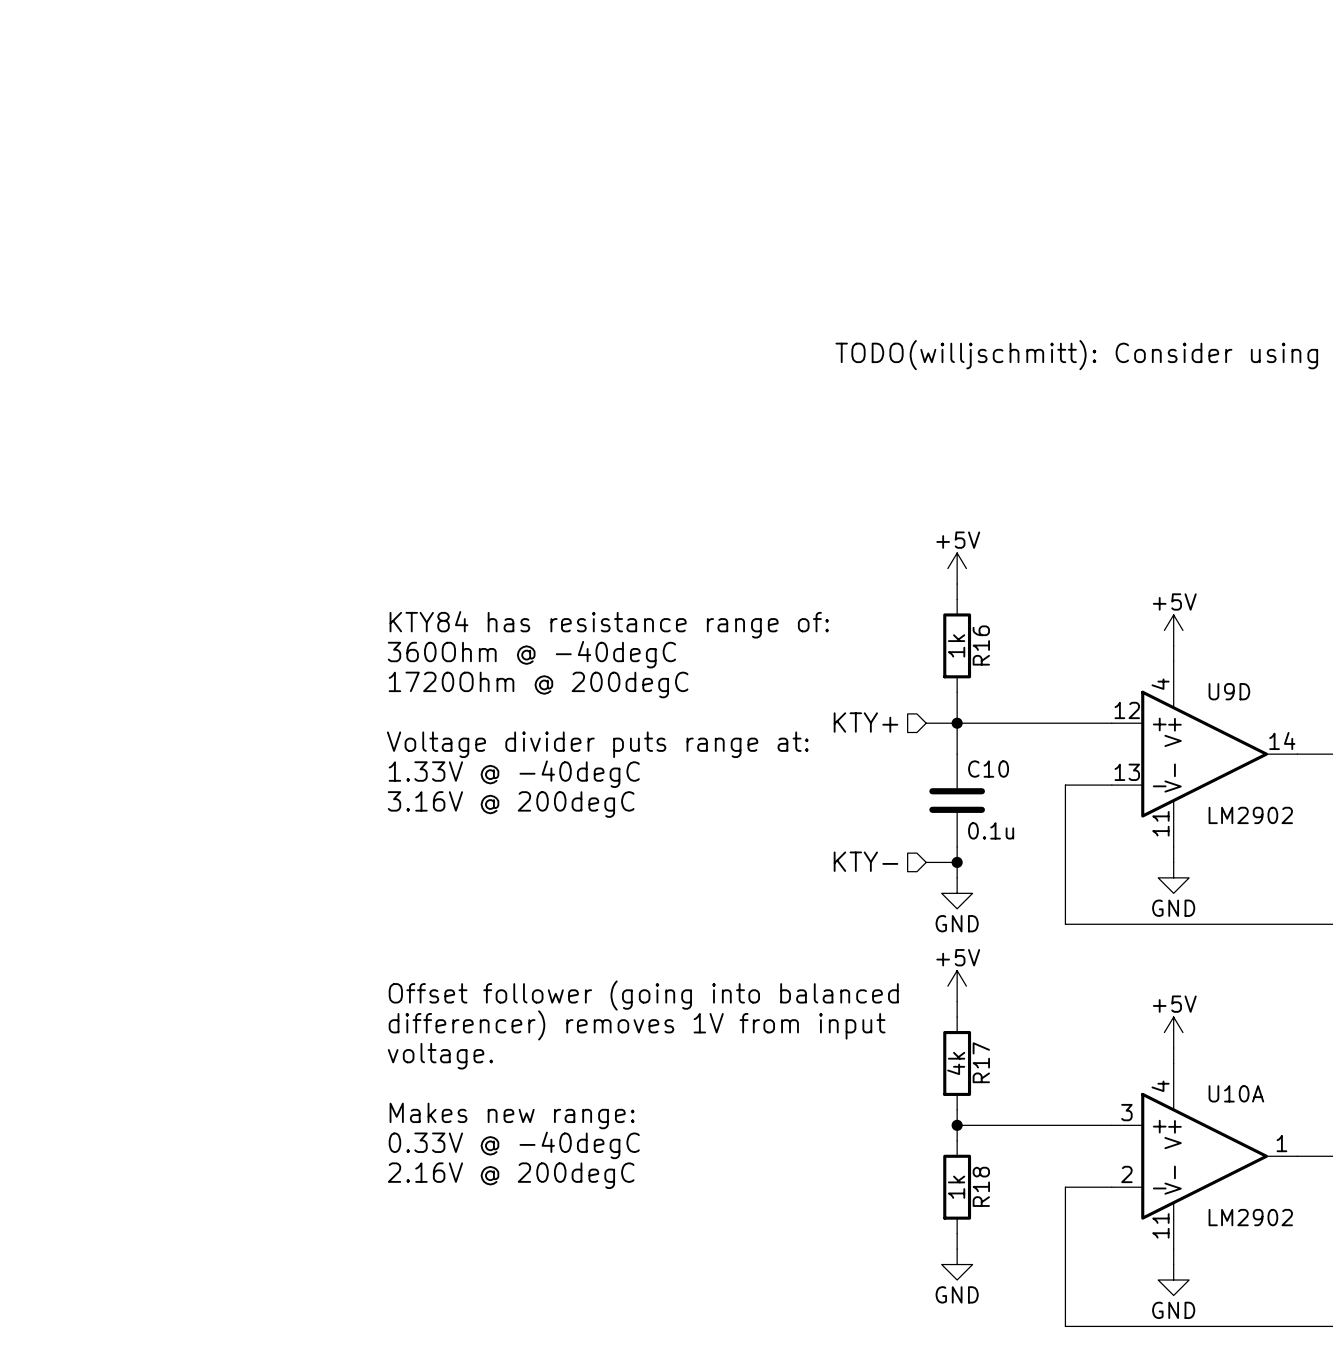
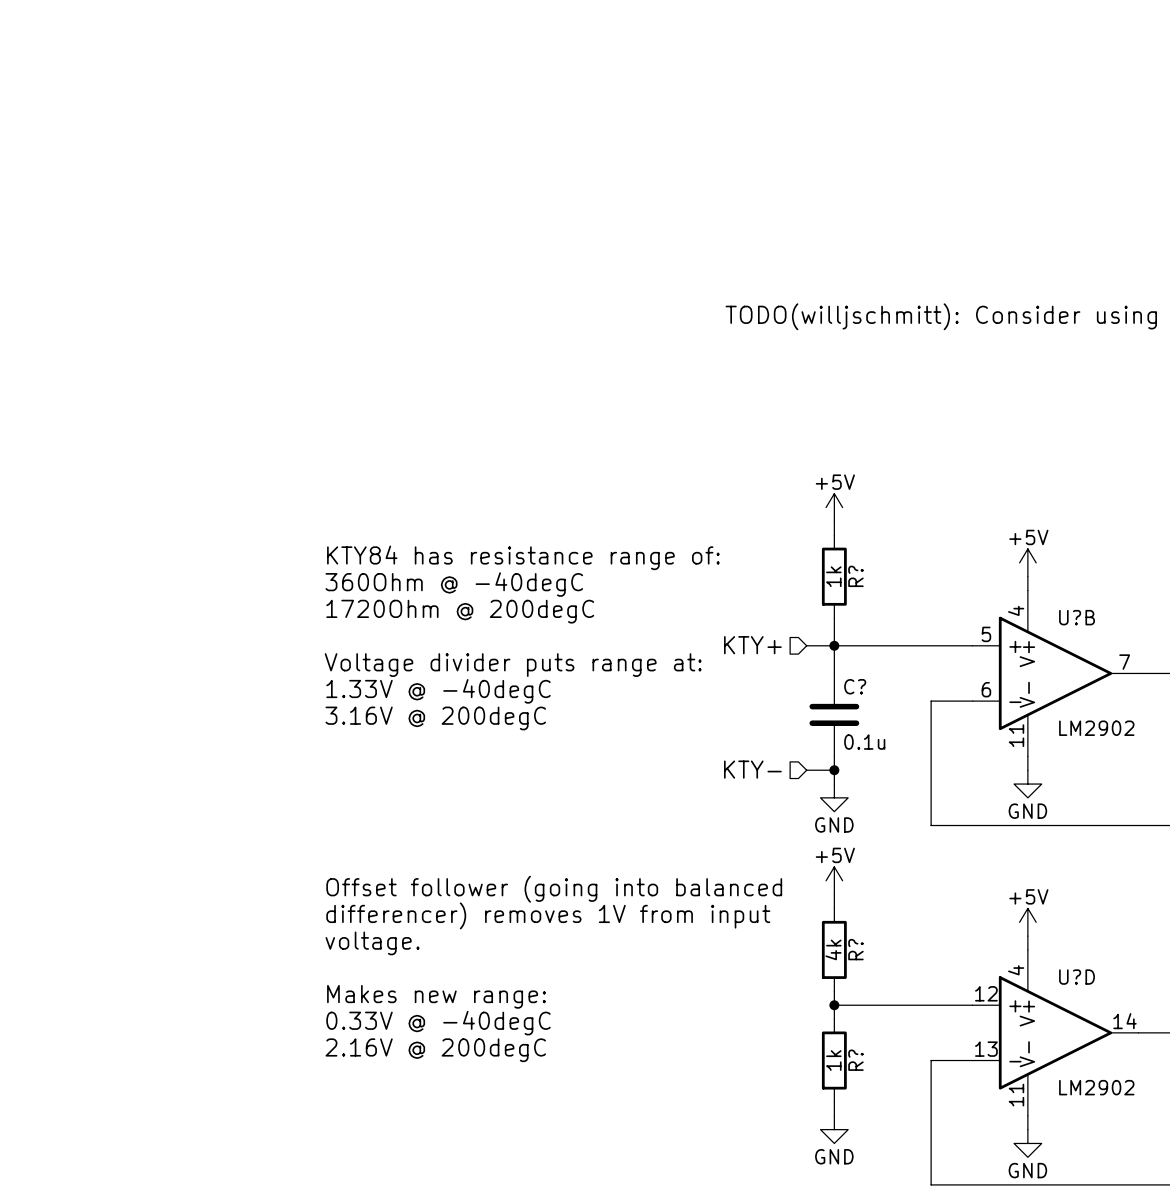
R16 name: R16 (981, 645) -> R? (855, 576)
U9D name: U9D (1229, 691) -> U?B (1077, 617)
U9D pin number: 12 (1127, 710) -> 5 (986, 634)
U9D pin number: 14 (1282, 741) -> 7 (1124, 662)
C10 name: C10 (988, 769) -> C? (855, 686)
U9D pin number: 13 (1127, 772) -> 6 (986, 689)
R17 name: R17 (981, 1062) -> R? (855, 949)
U10A name: U10A (1236, 1093) -> U?D (1077, 977)
U10A pin number: 3 (1126, 1112) -> 12 (986, 993)
U10A pin number: 1 (1281, 1143) -> 14 (1124, 1021)
U10A pin number: 2 (1126, 1174) -> 13 (986, 1049)
R18 name: R18 (981, 1186) -> R? (855, 1060)

